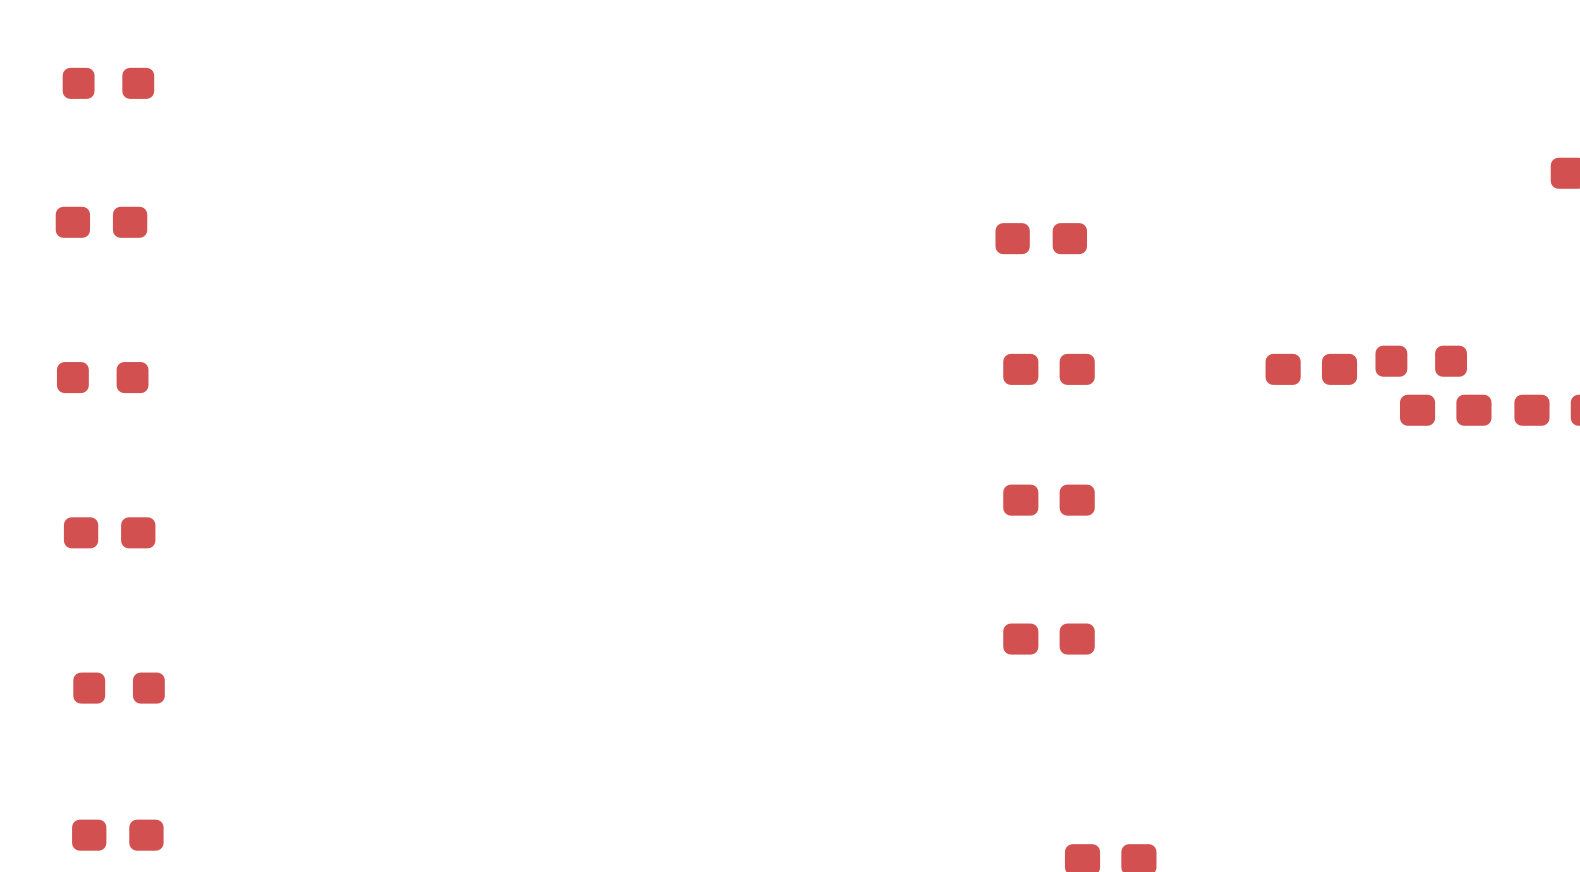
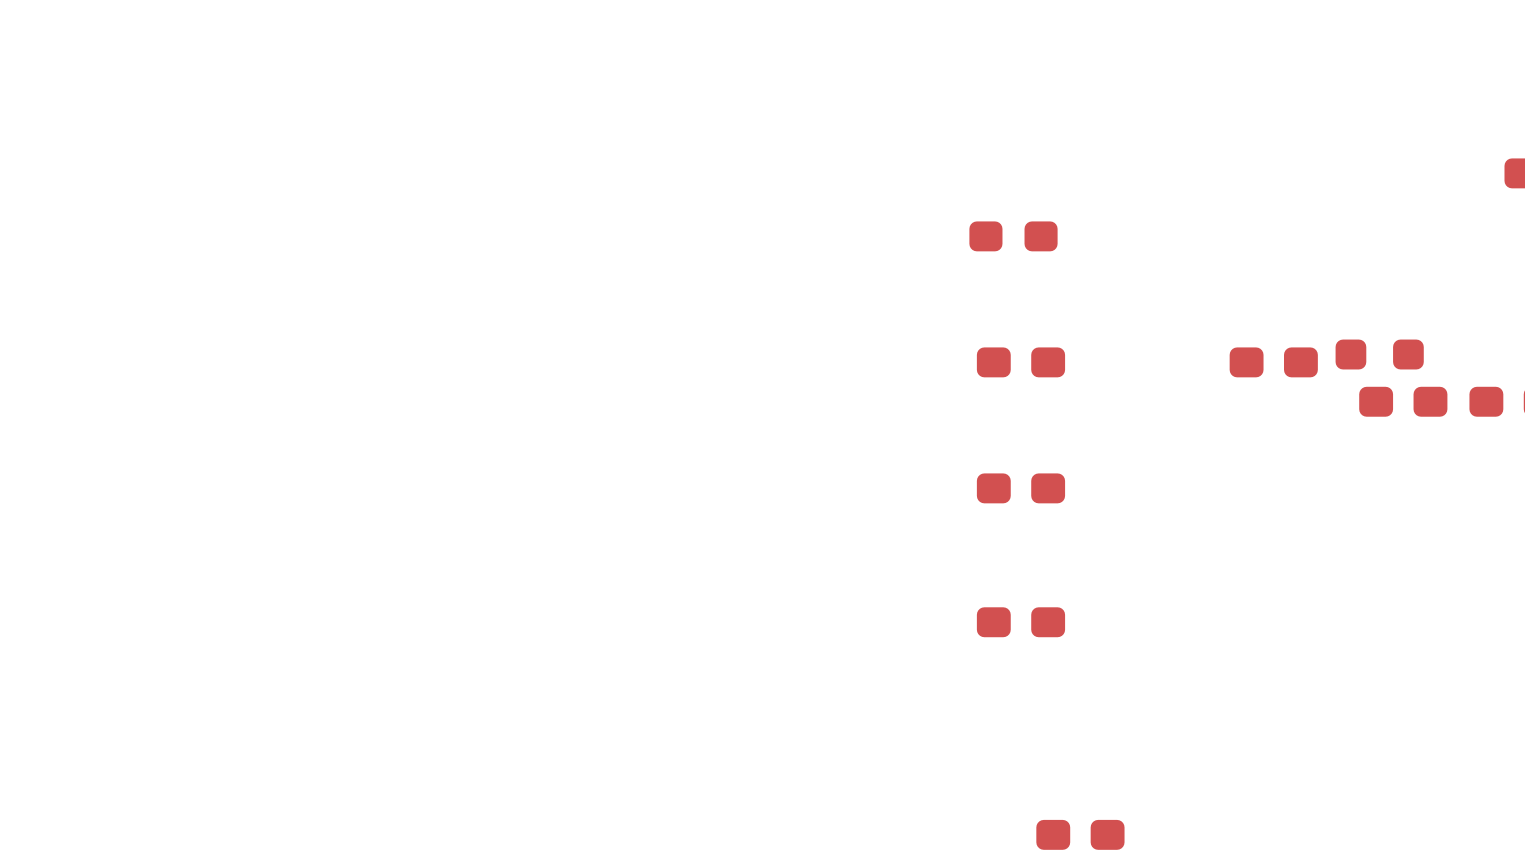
part: (108, 83) -> none
part: (101, 222) -> none
part: (102, 377) -> none
part: (109, 532) -> none
part: (119, 688) -> none
part: (117, 835) -> none

